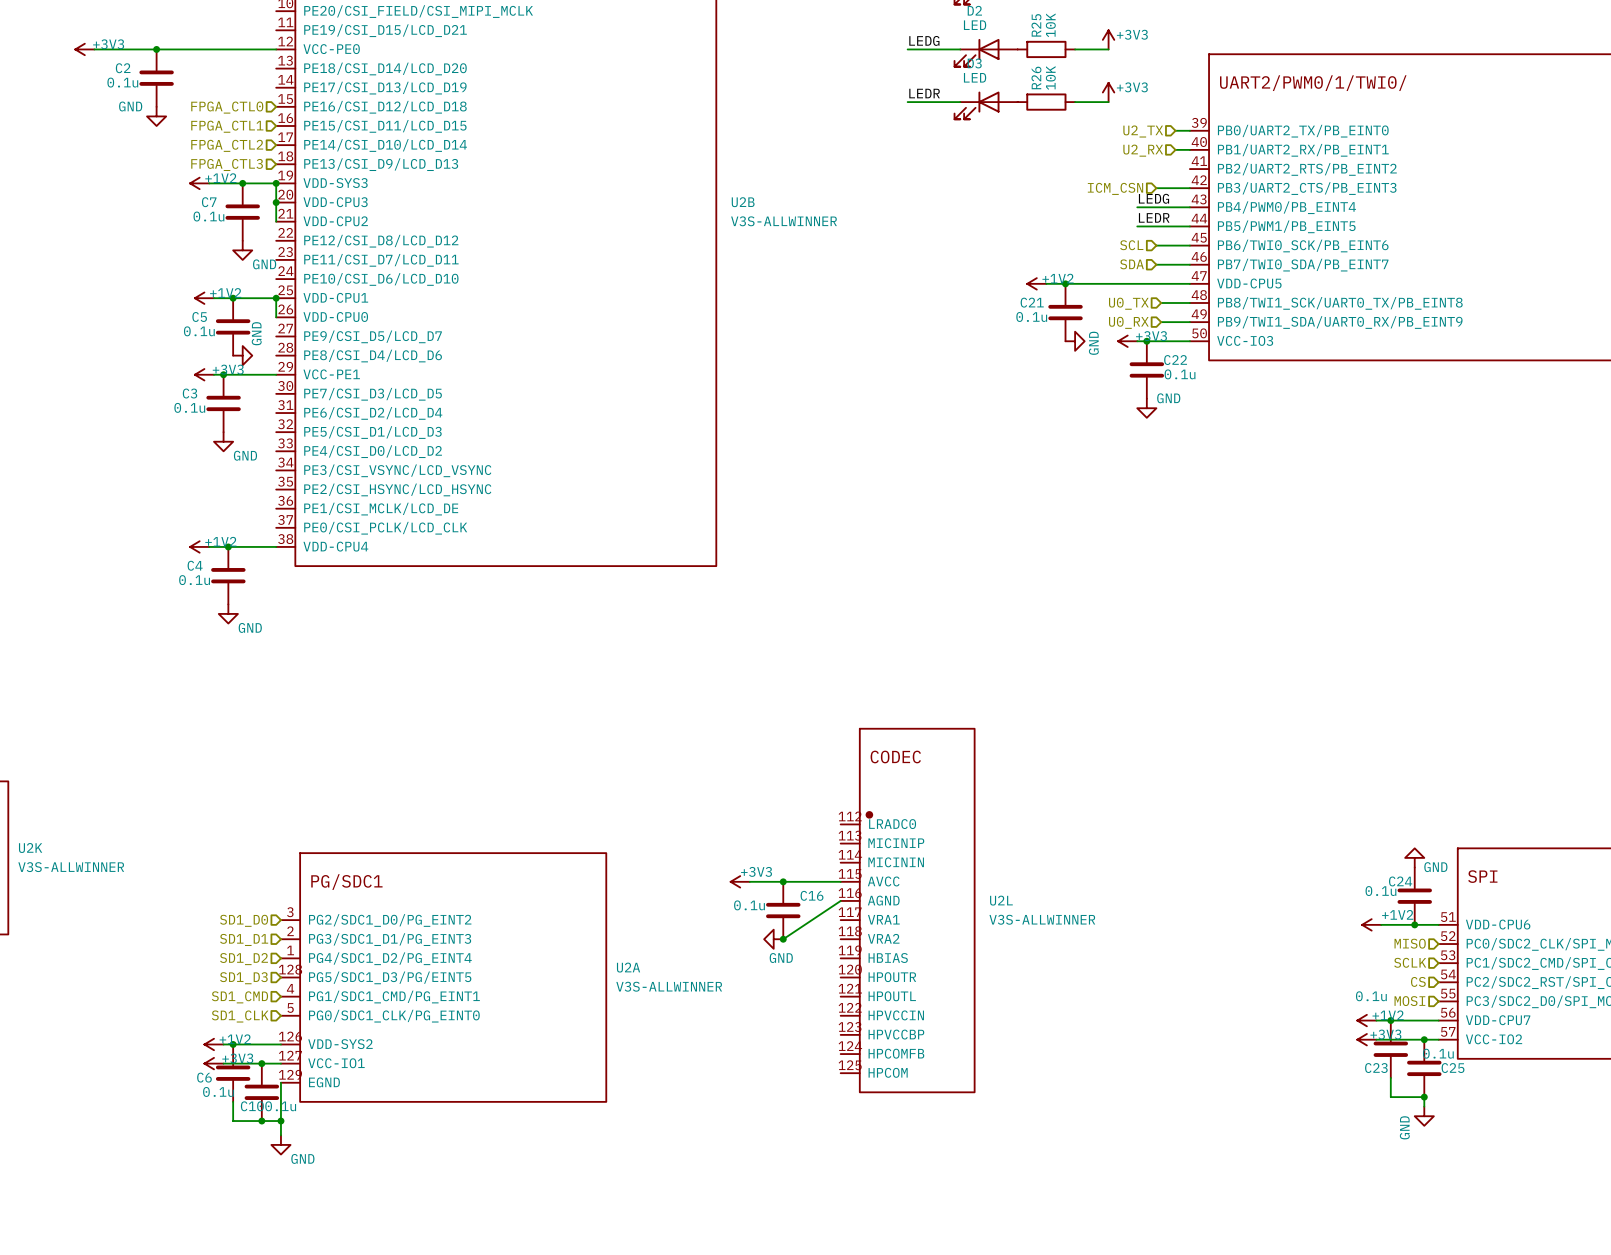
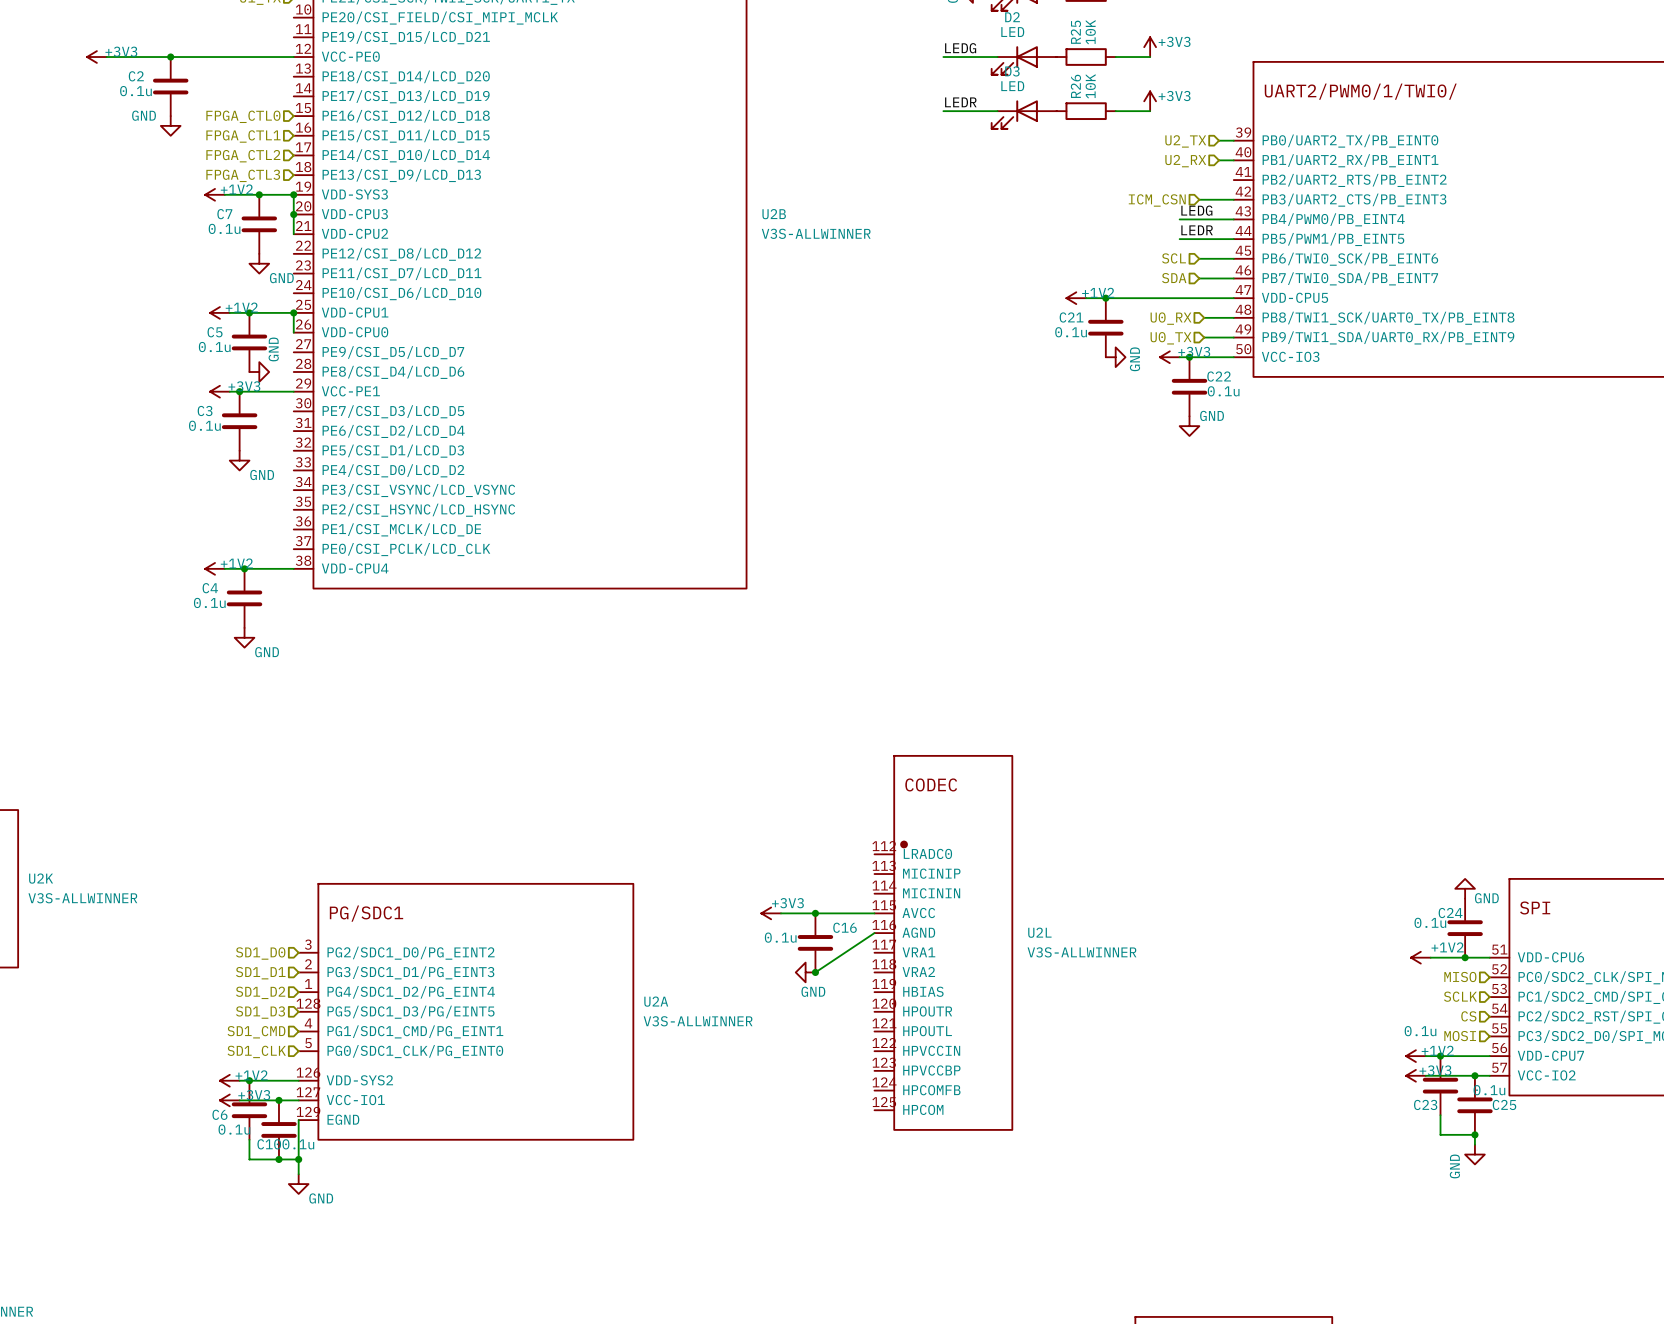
hierarchical label: U0_TX (1128, 303) -> U0_RX (1170, 318)
hierarchical label: U0_RX (1128, 322) -> U0_TX (1170, 338)

